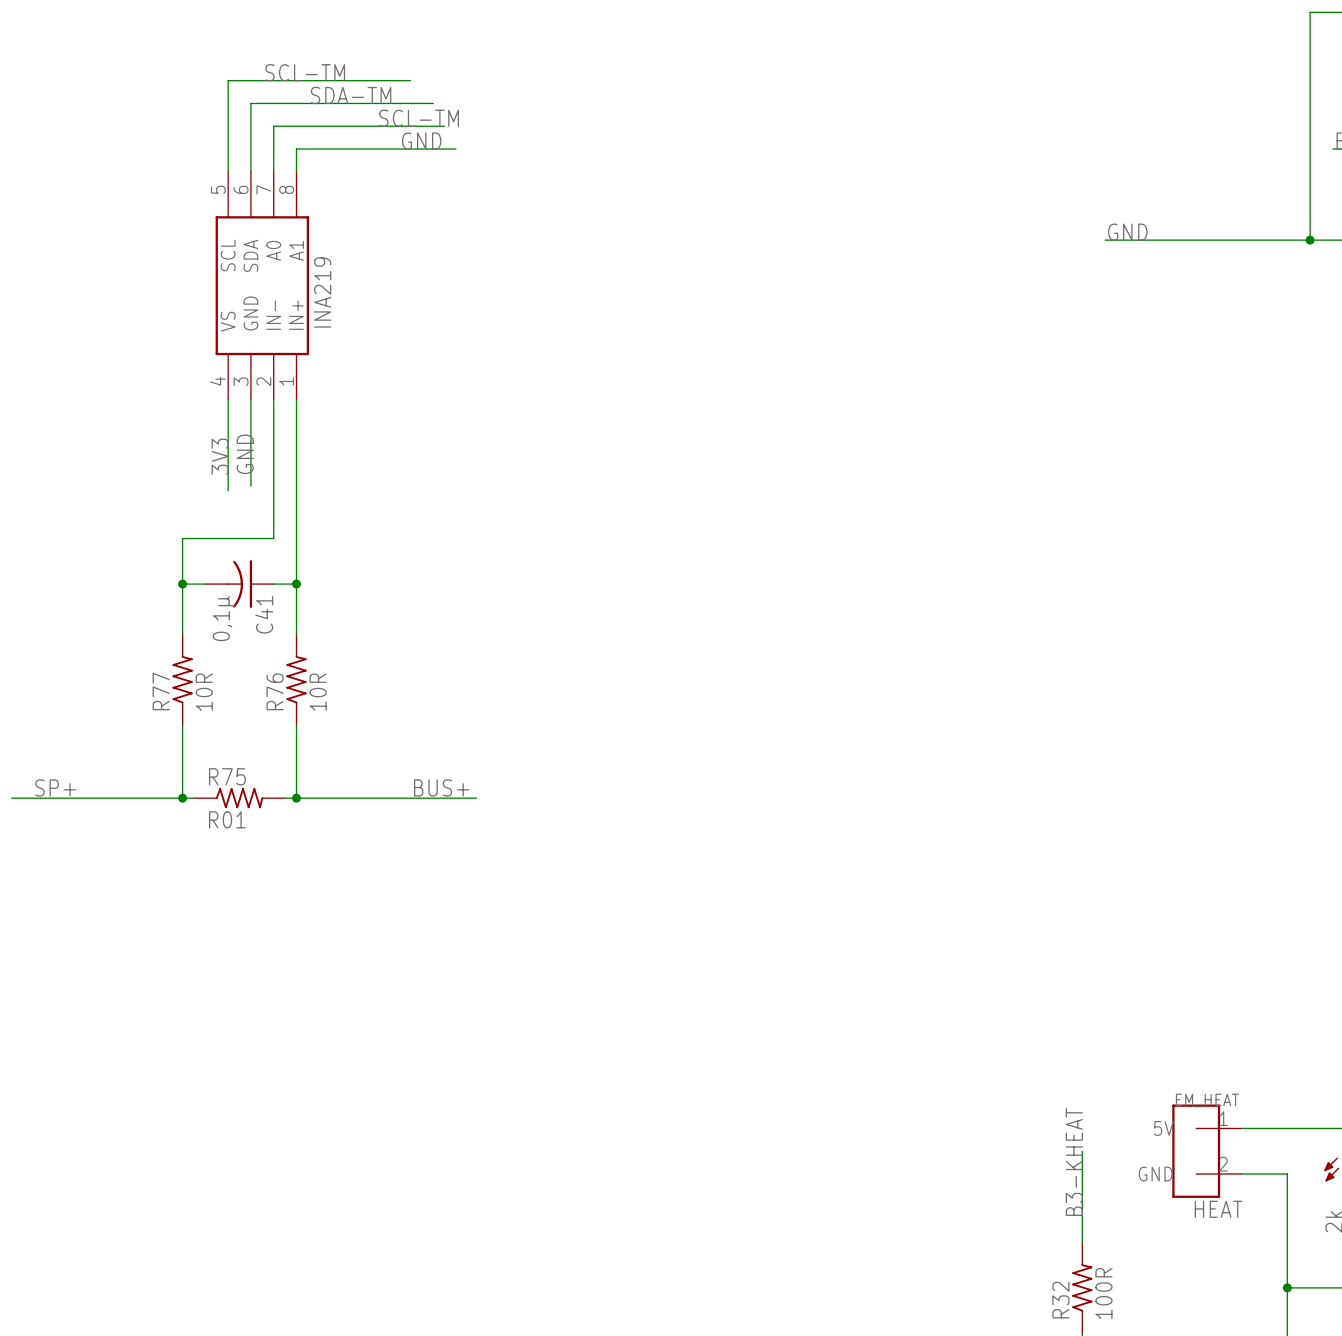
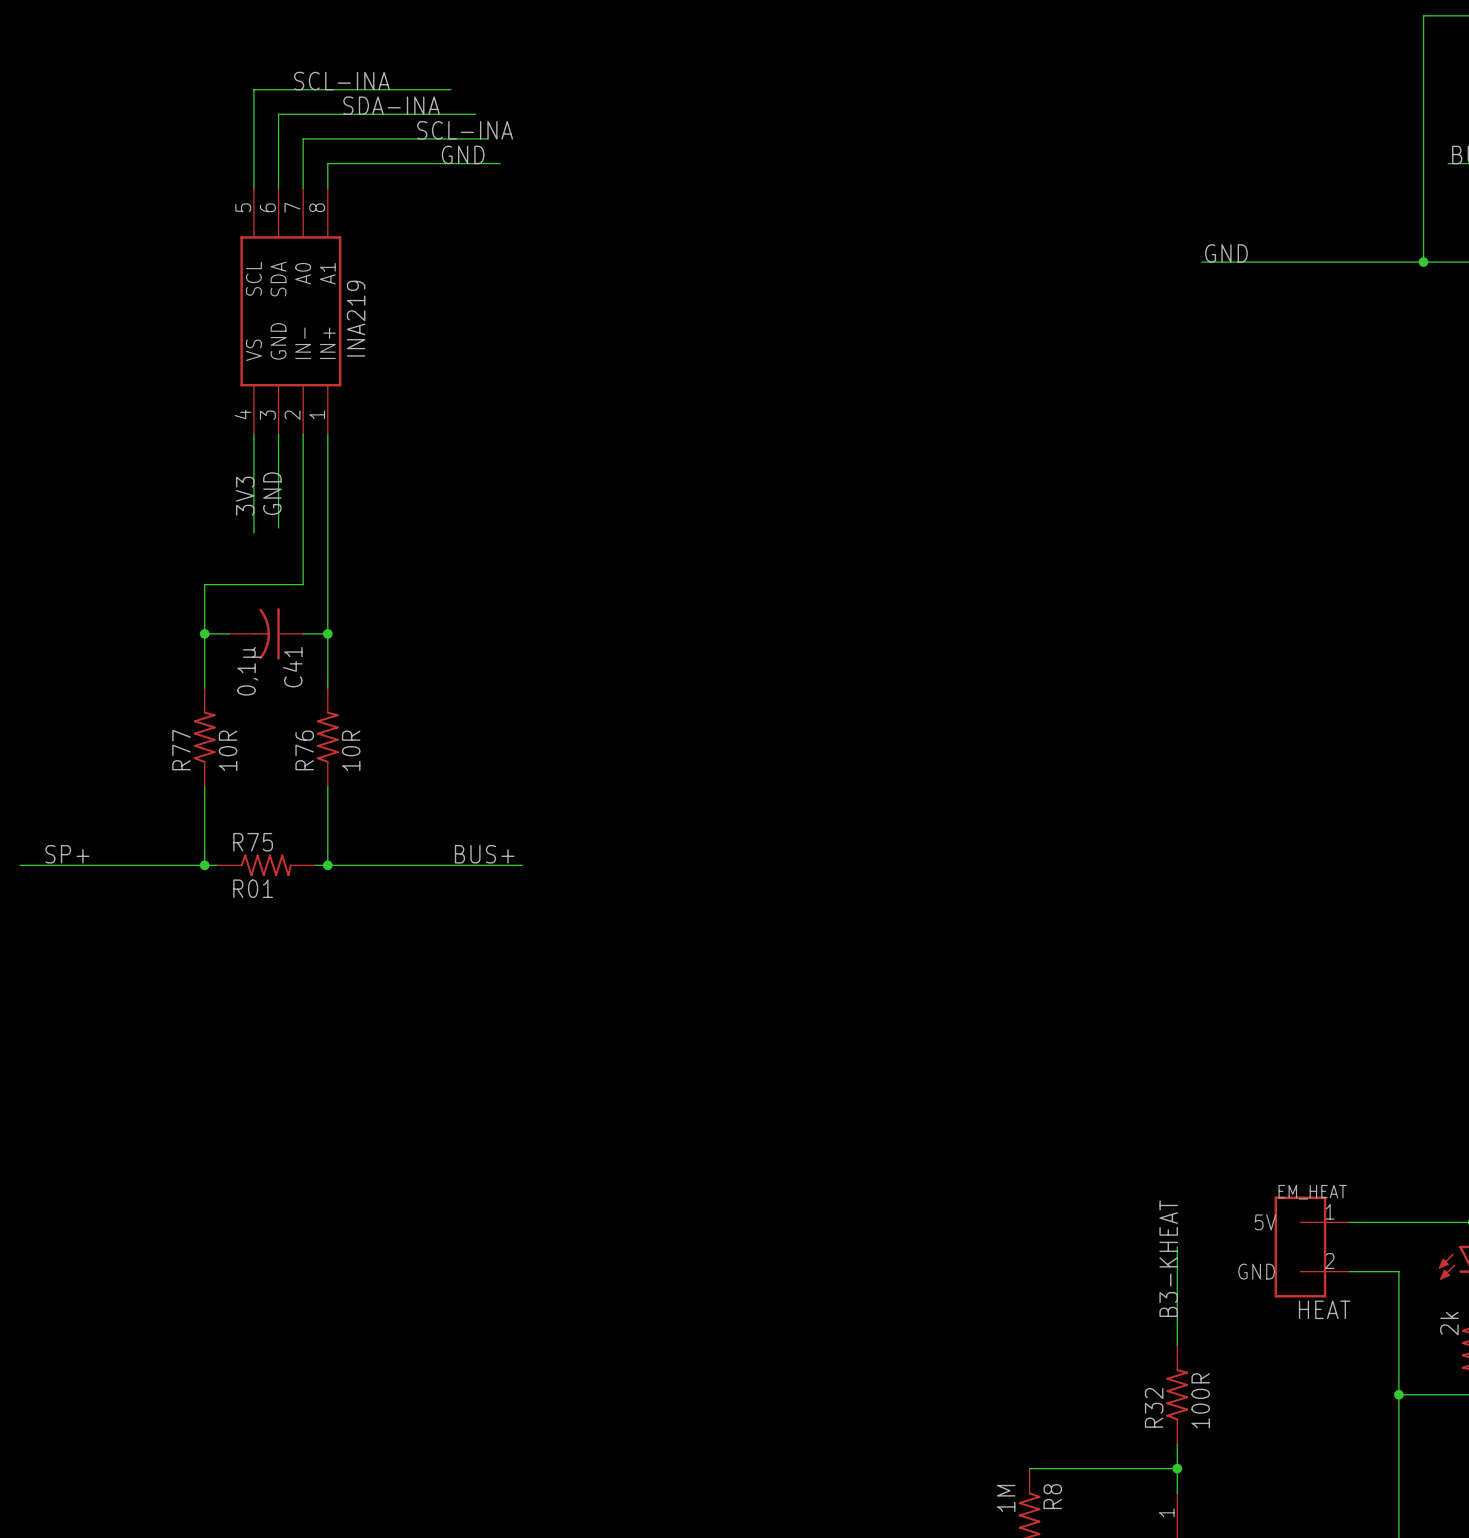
label: SCL-TM (305, 72) -> SCL-INA (342, 81)
label: SDA-TM (351, 95) -> SDA-INA (391, 105)
label: SCL-TM (419, 118) -> SCL-INA (465, 130)

